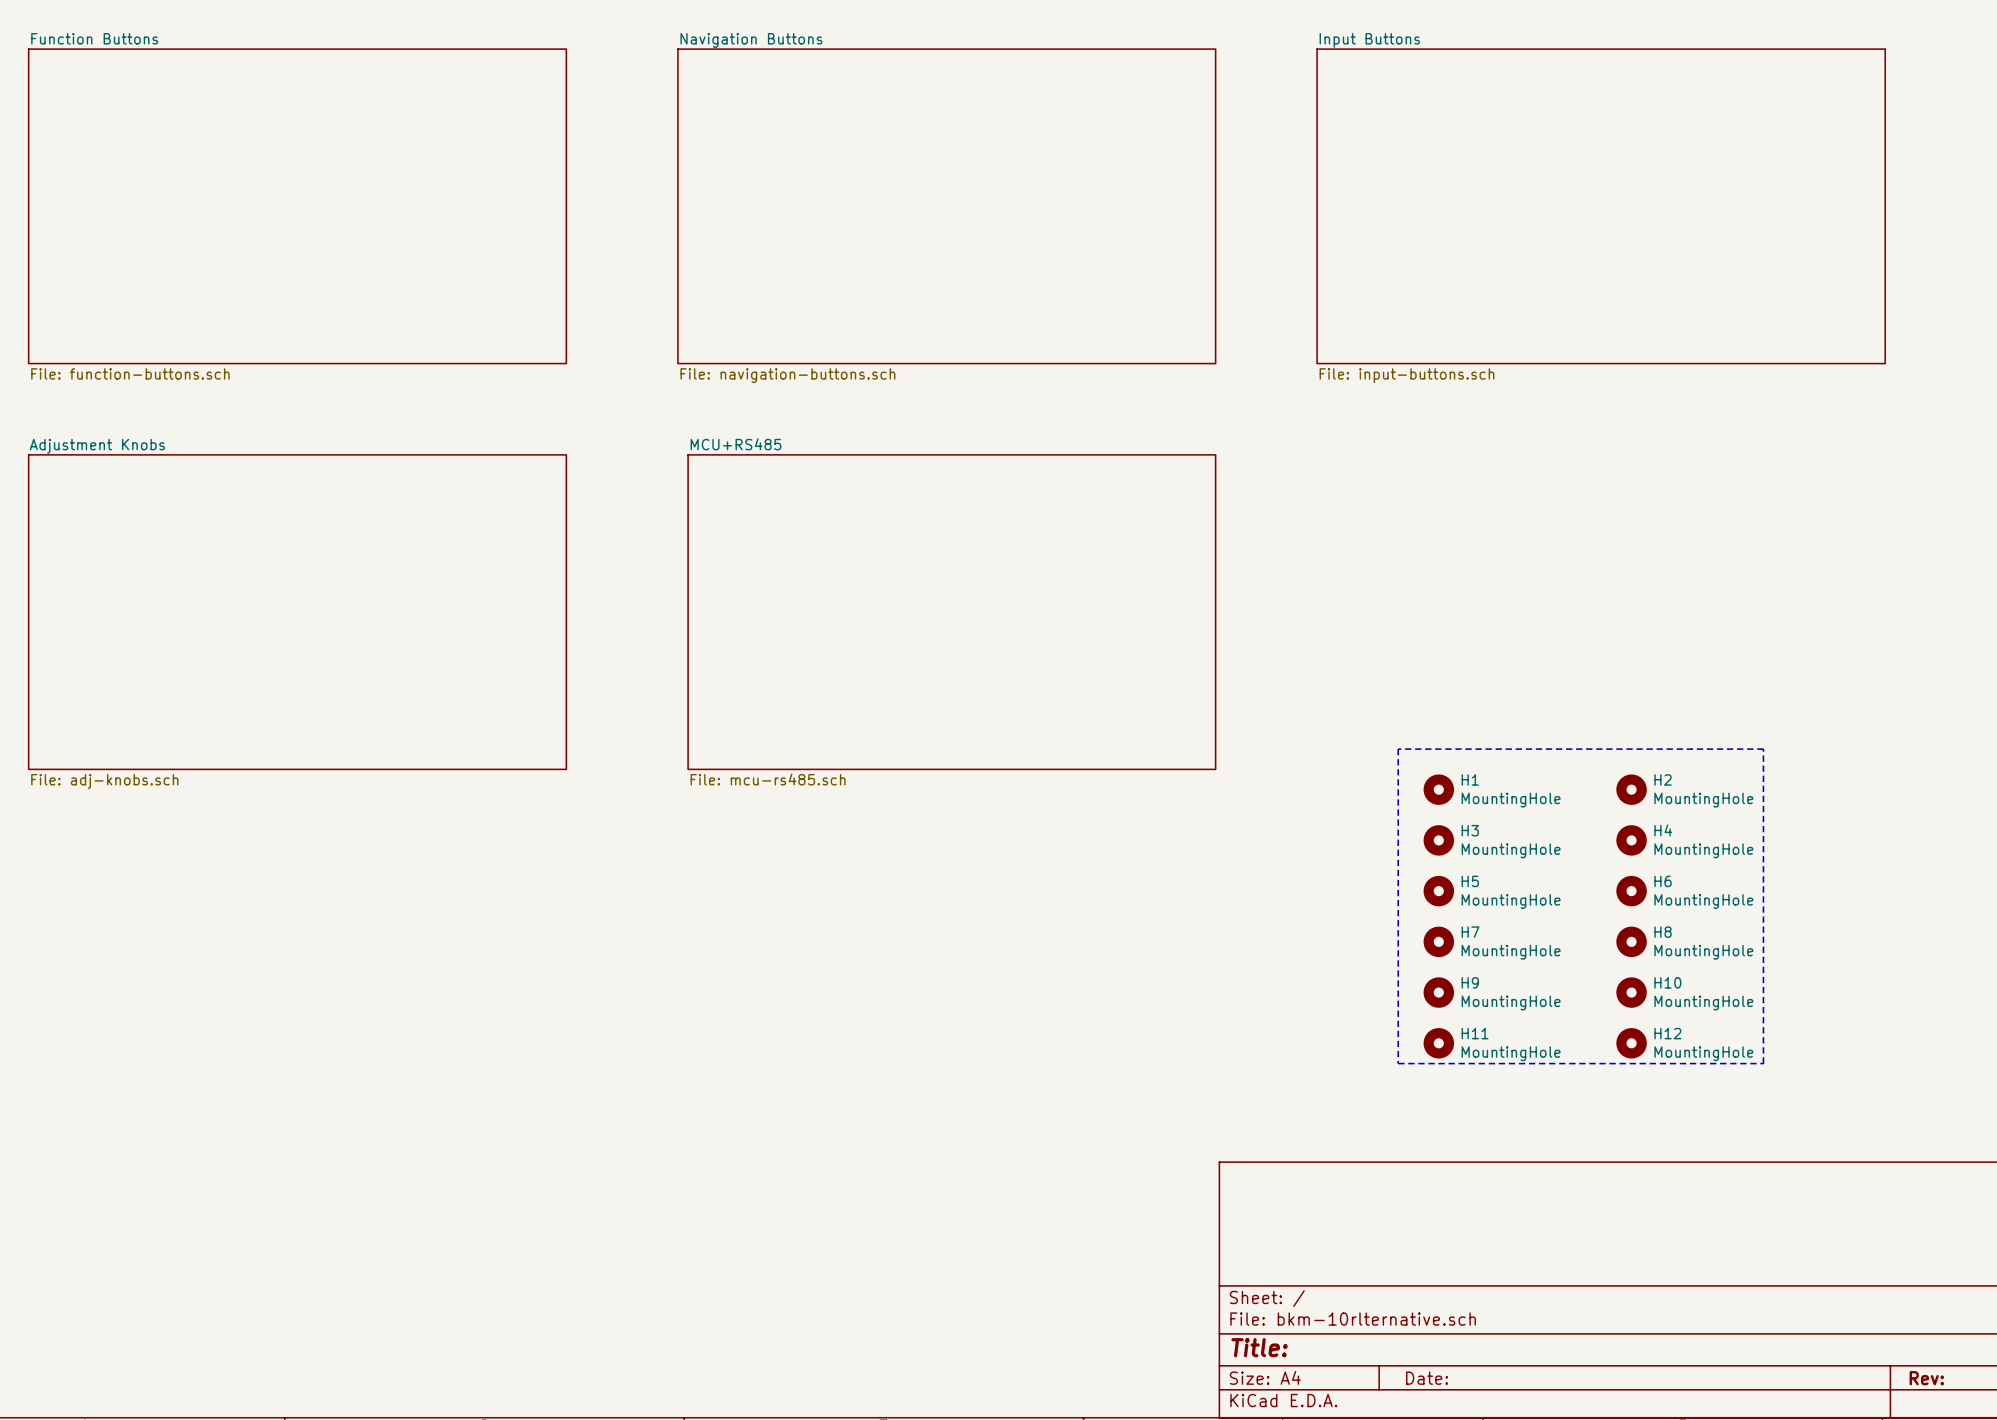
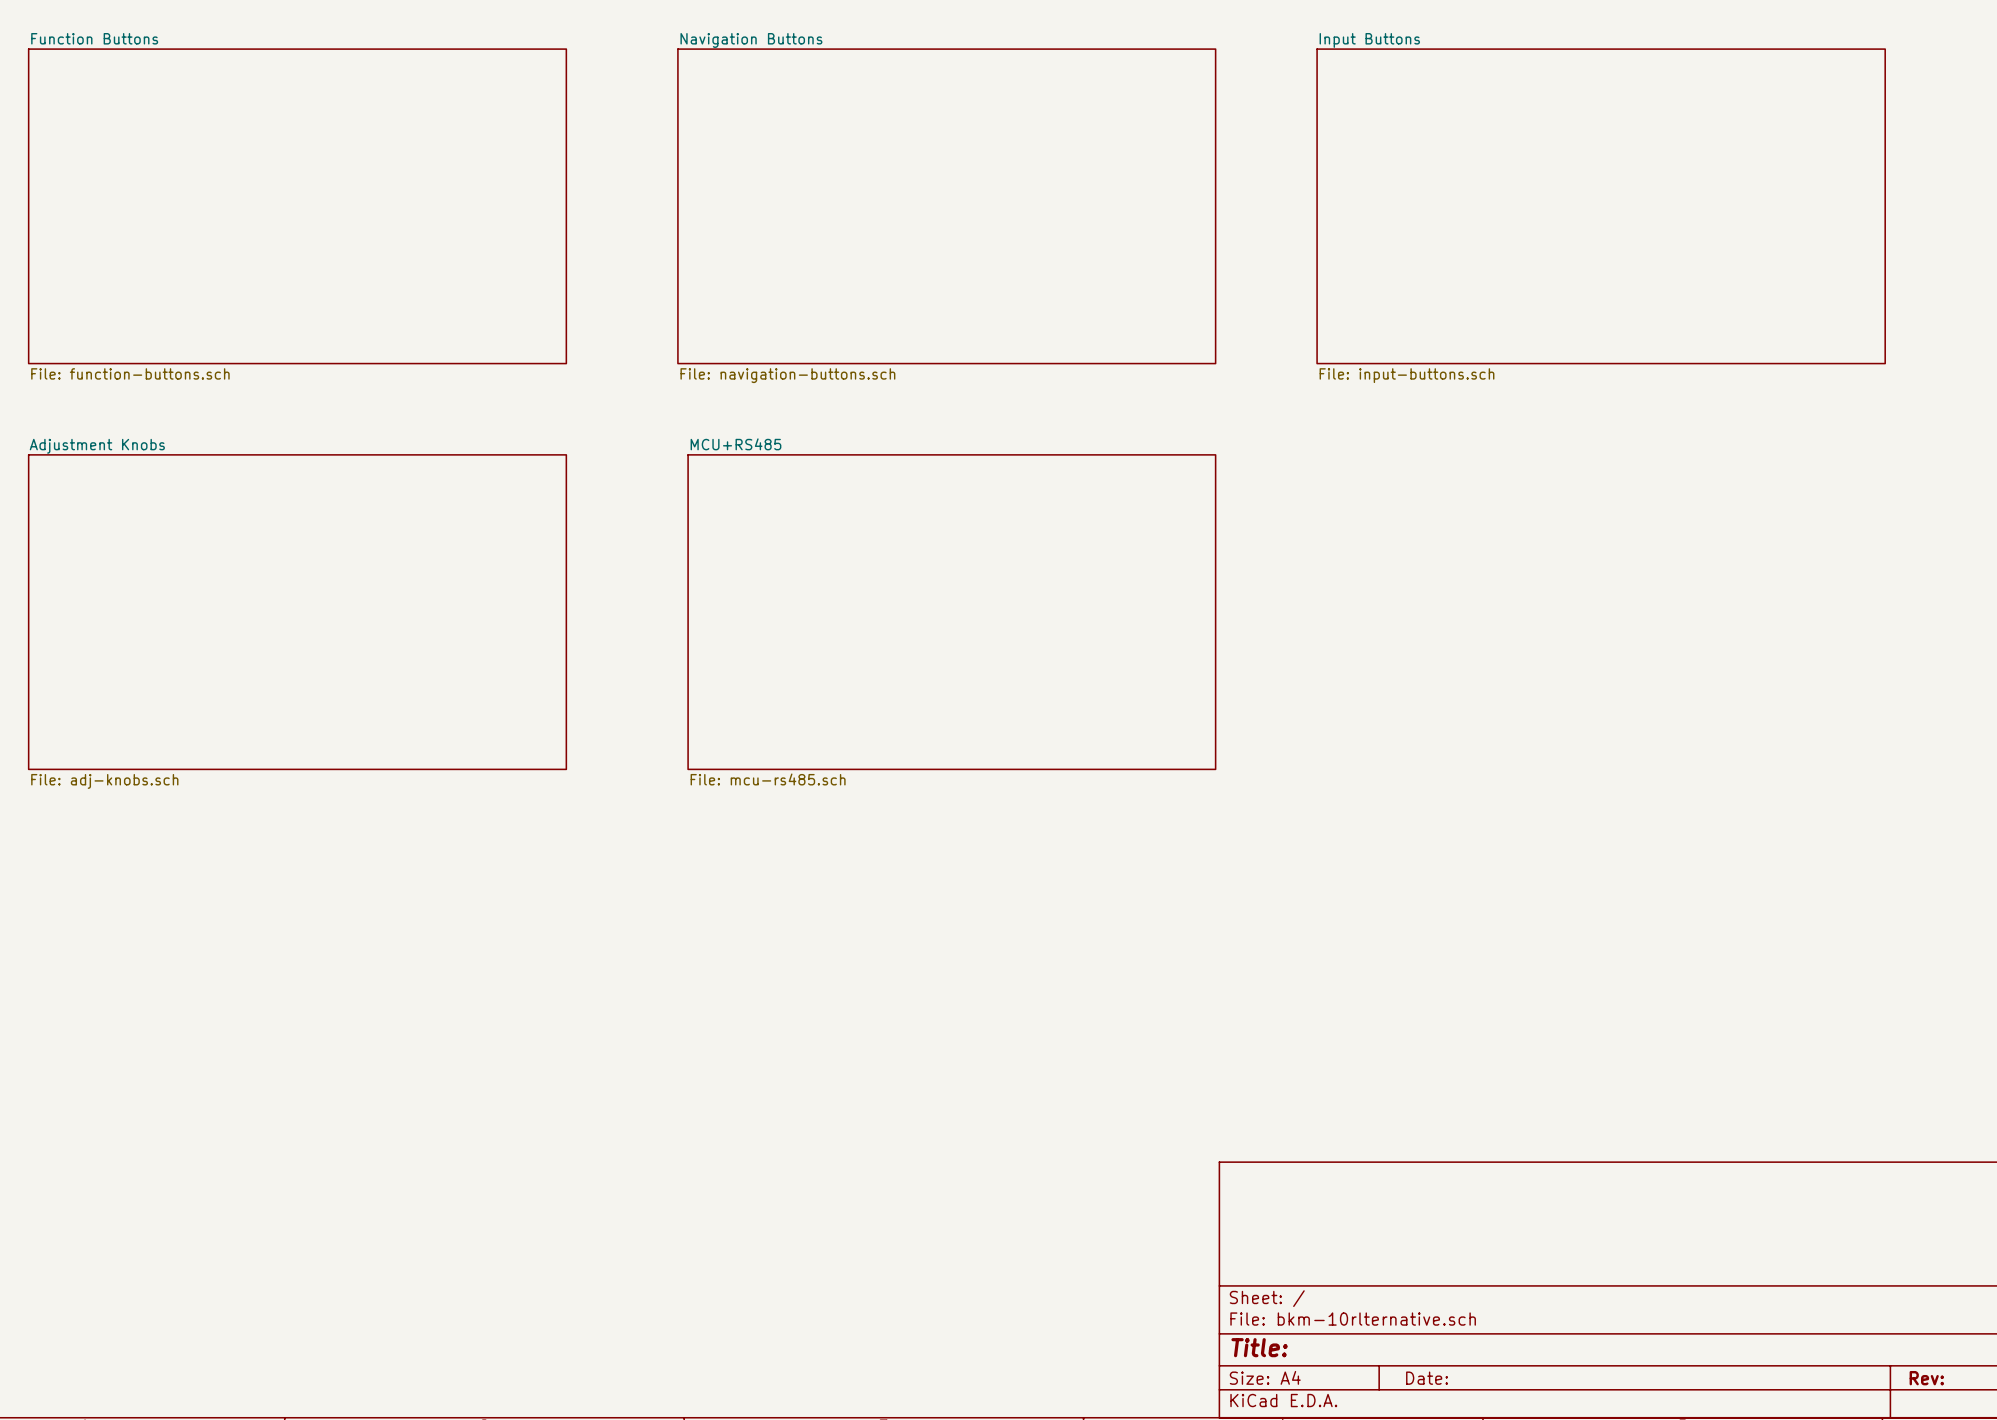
line: (1398, 749) (1398, 1063) (1763, 1063) (1763, 749) (1398, 749) -> none
H1: MountingHole (1438, 789) -> none
H2: MountingHole (1631, 789) -> none
H3: MountingHole (1438, 840) -> none
H4: MountingHole (1631, 840) -> none
H5: MountingHole (1438, 891) -> none
H6: MountingHole (1631, 891) -> none
H7: MountingHole (1438, 941) -> none
H8: MountingHole (1631, 941) -> none
H9: MountingHole (1438, 992) -> none
H10: MountingHole (1631, 992) -> none
H11: MountingHole (1438, 1043) -> none
H12: MountingHole (1631, 1043) -> none

